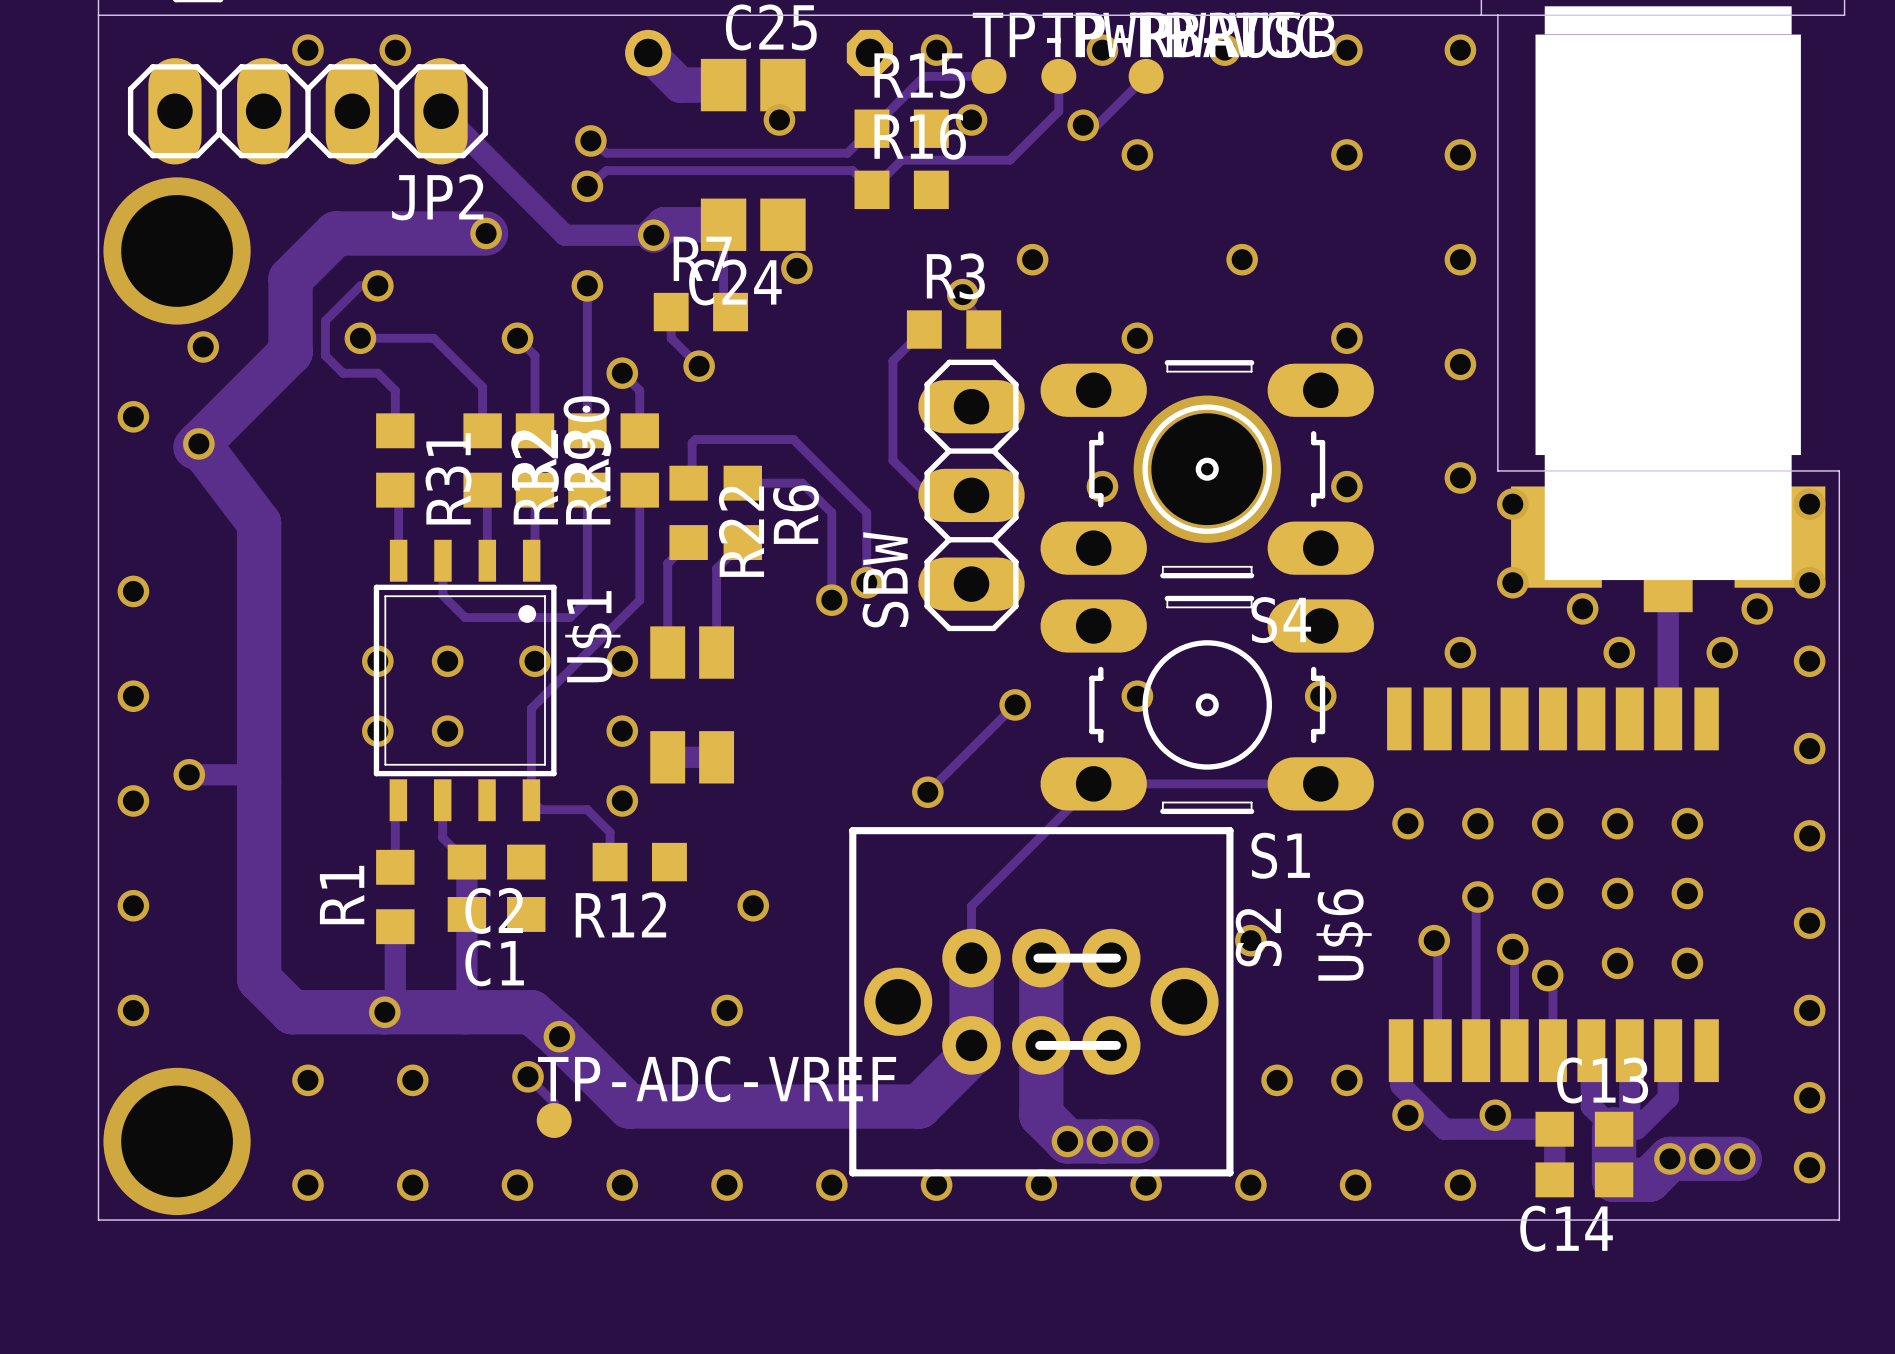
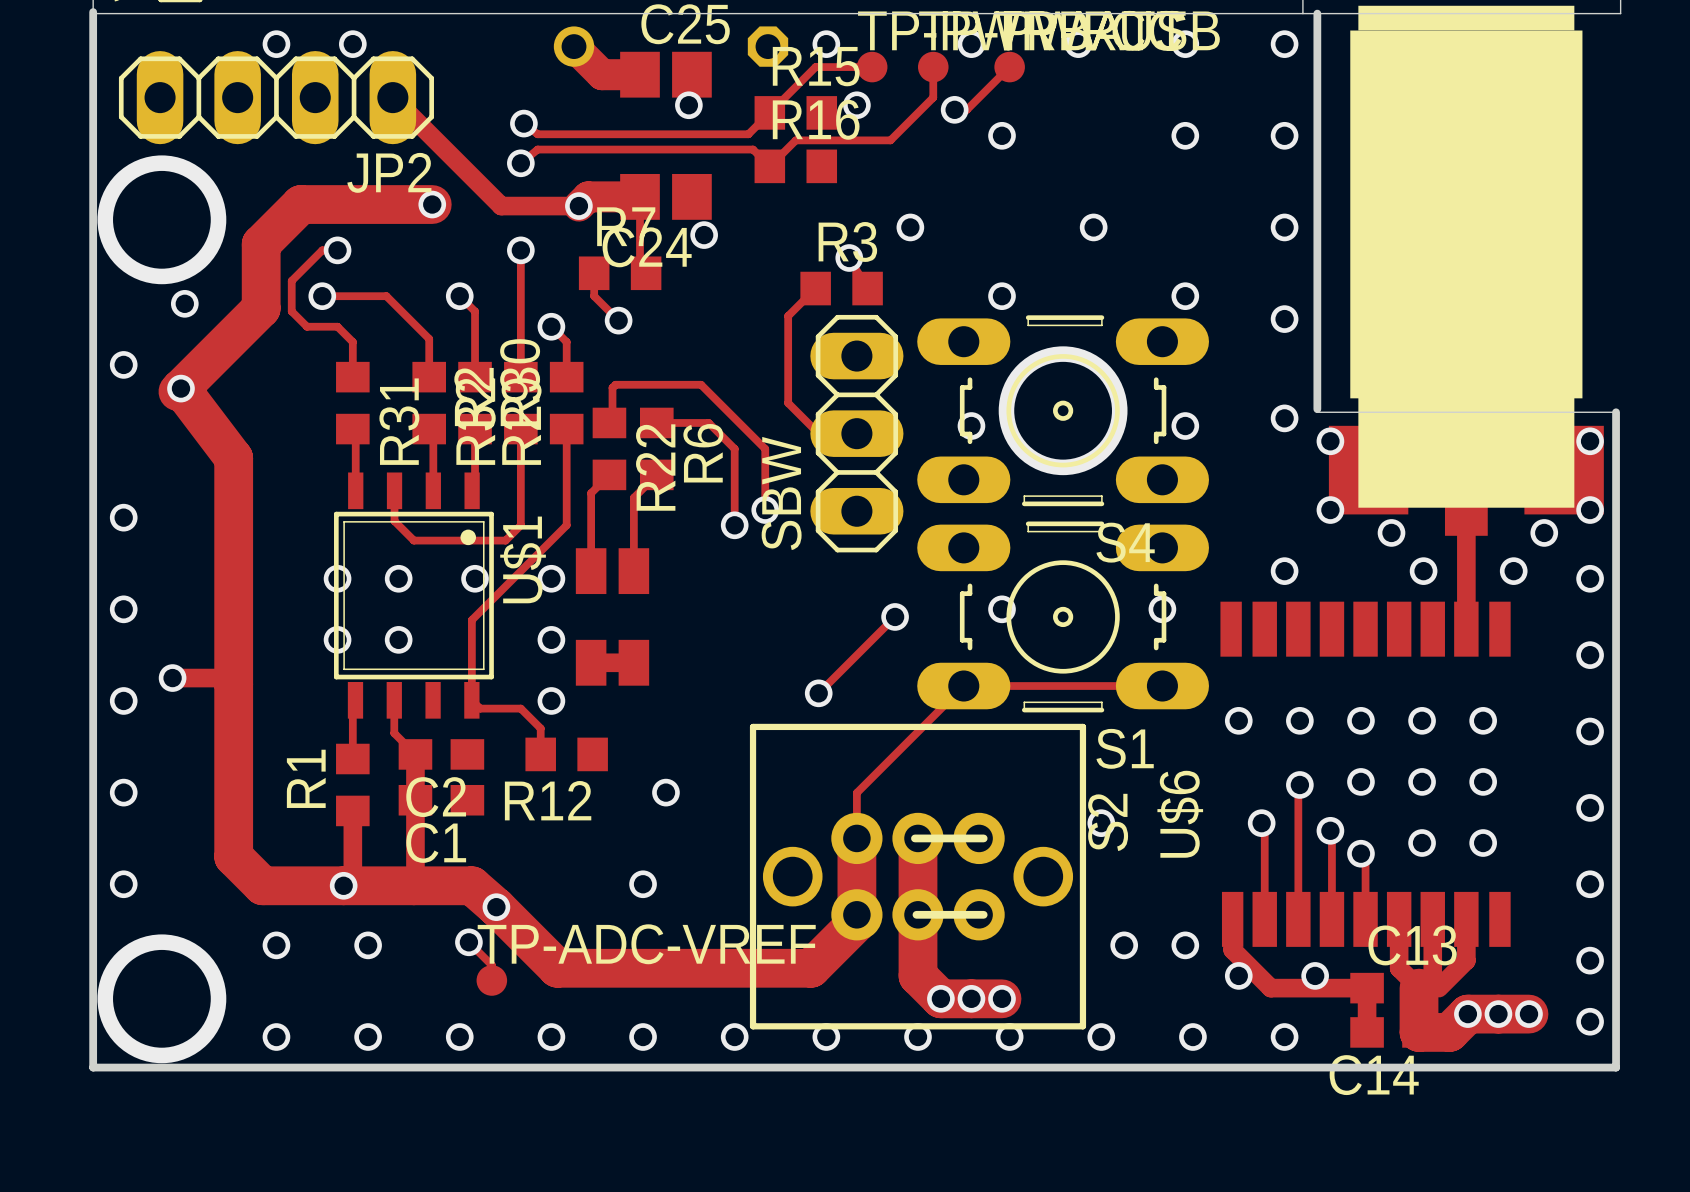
board edge width: thin (98, 13) (98, 1220) (1839, 1220) (1839, 470) -> thick (93, 12) (93, 1067) (1616, 1067) (1616, 412)
board edge width: thin (1497, 15) (1497, 467) -> thick (1317, 13) (1317, 409)

